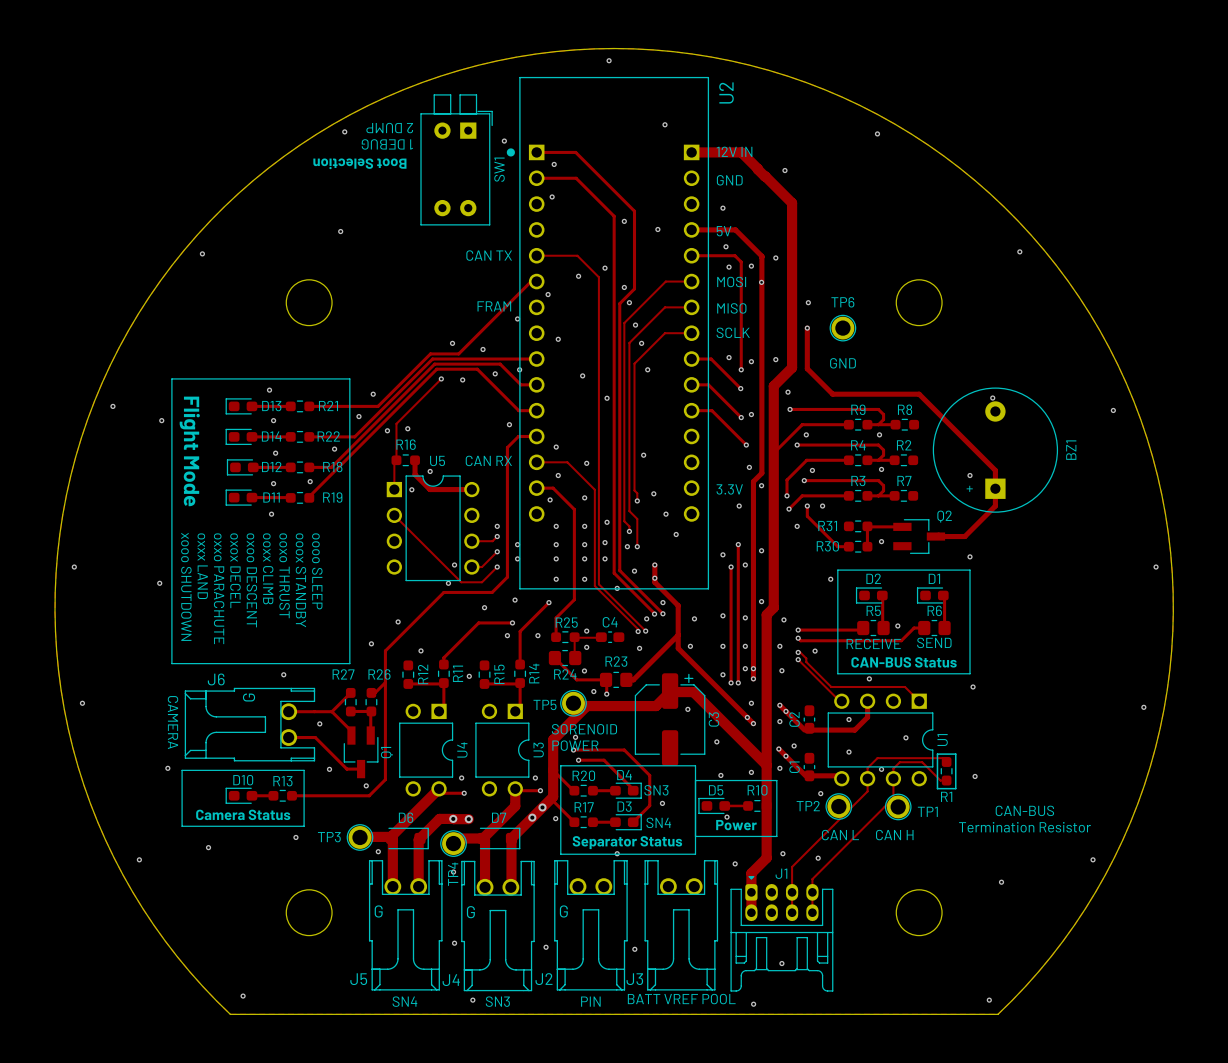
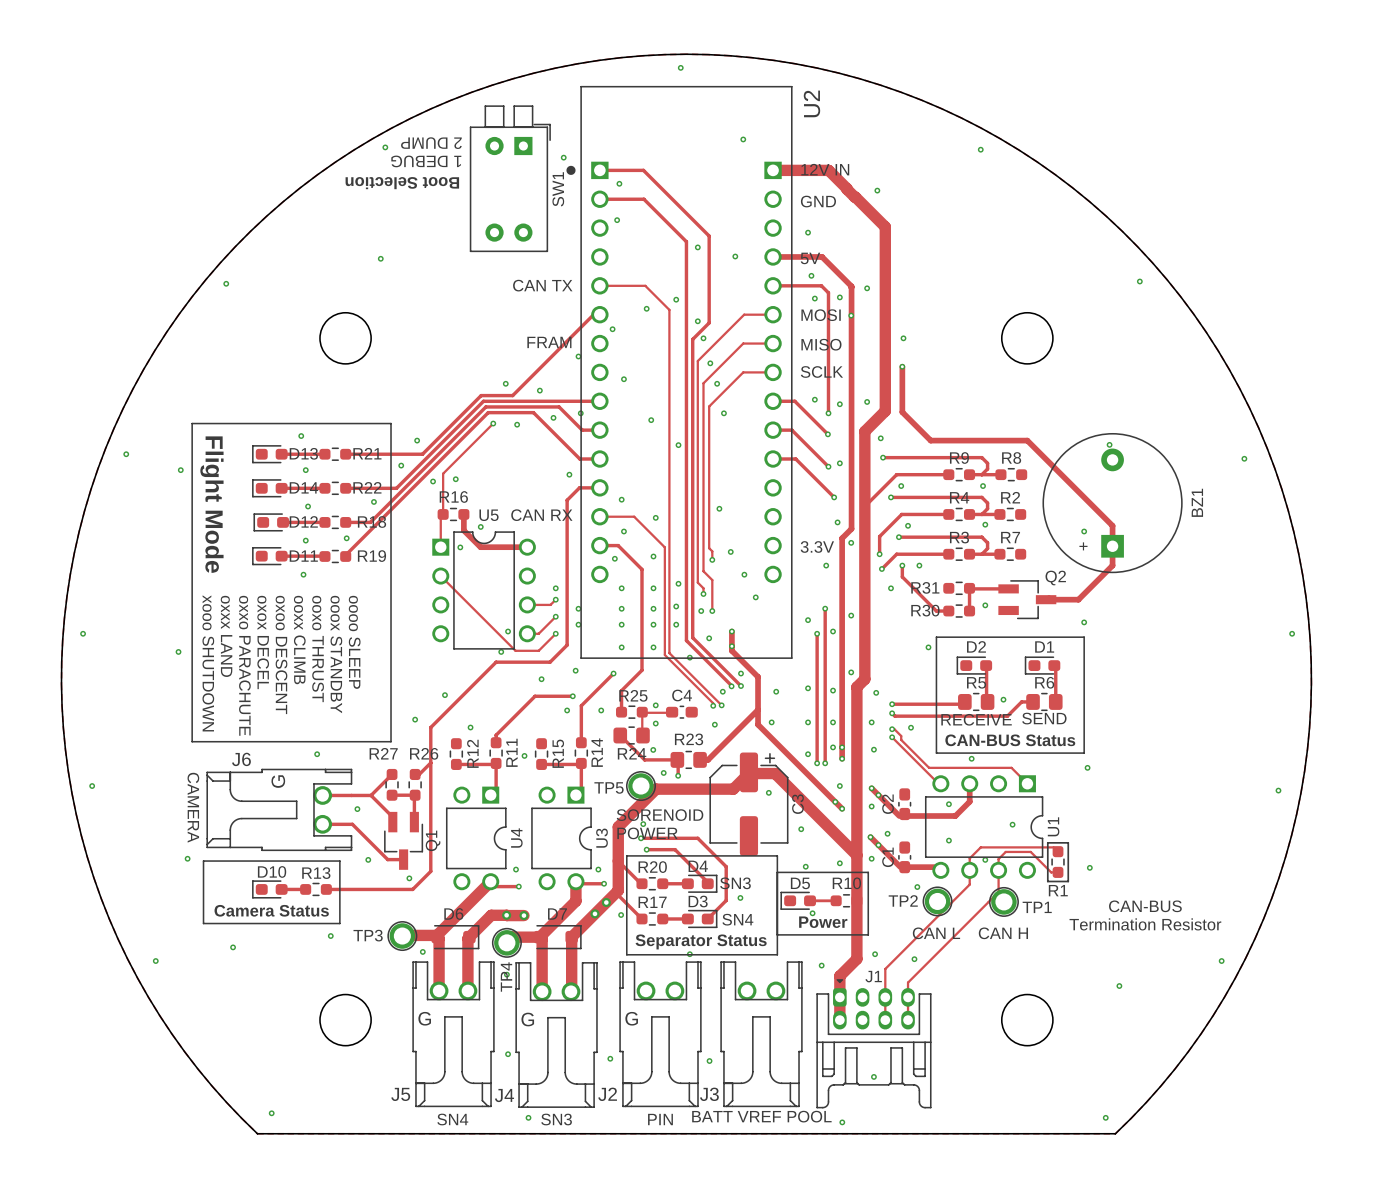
TP6: (842, 328) -> none
text: GND (842, 363) -> none

